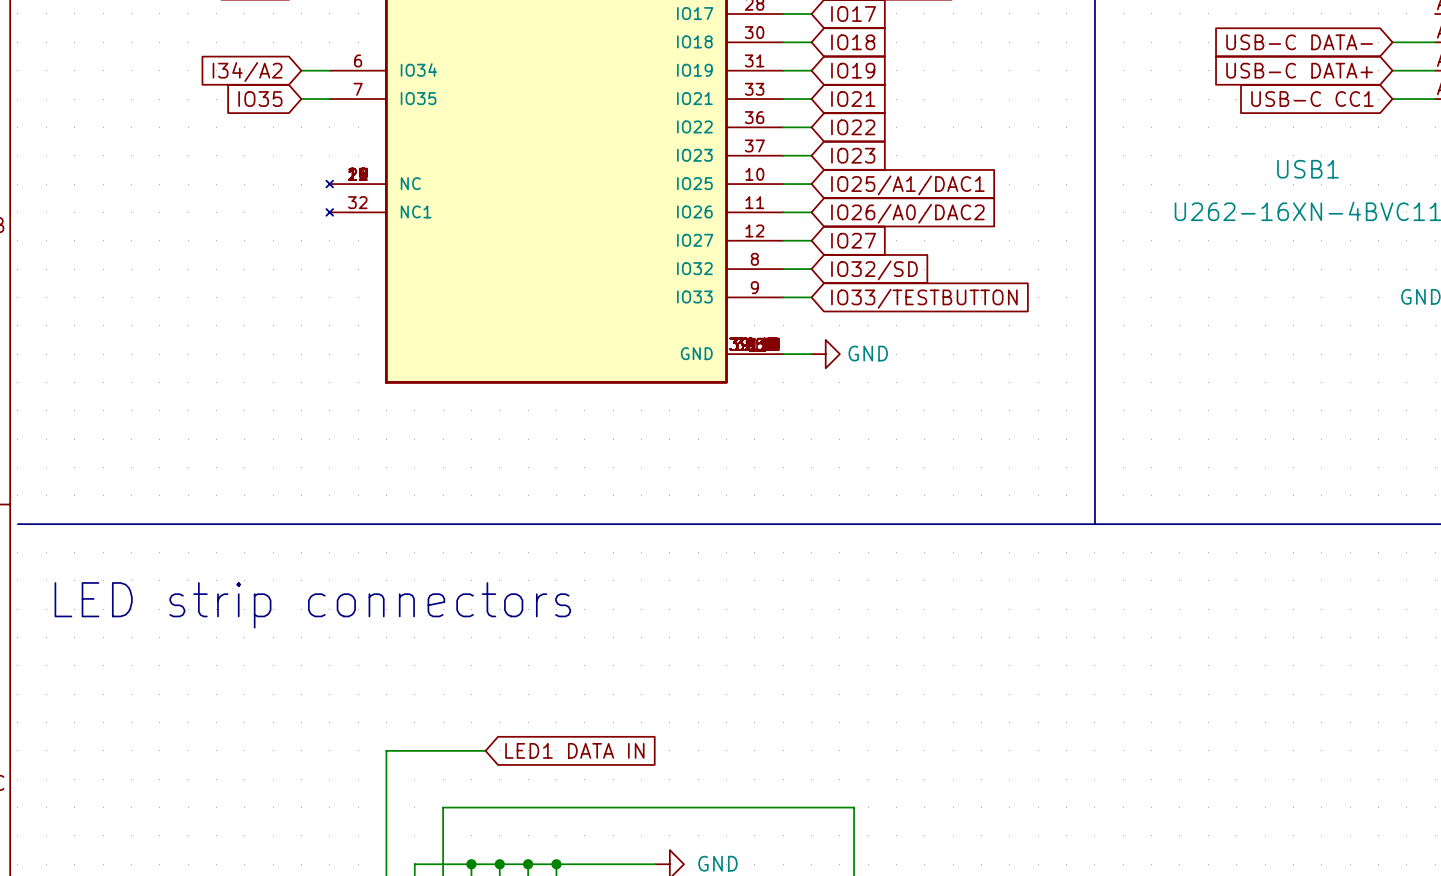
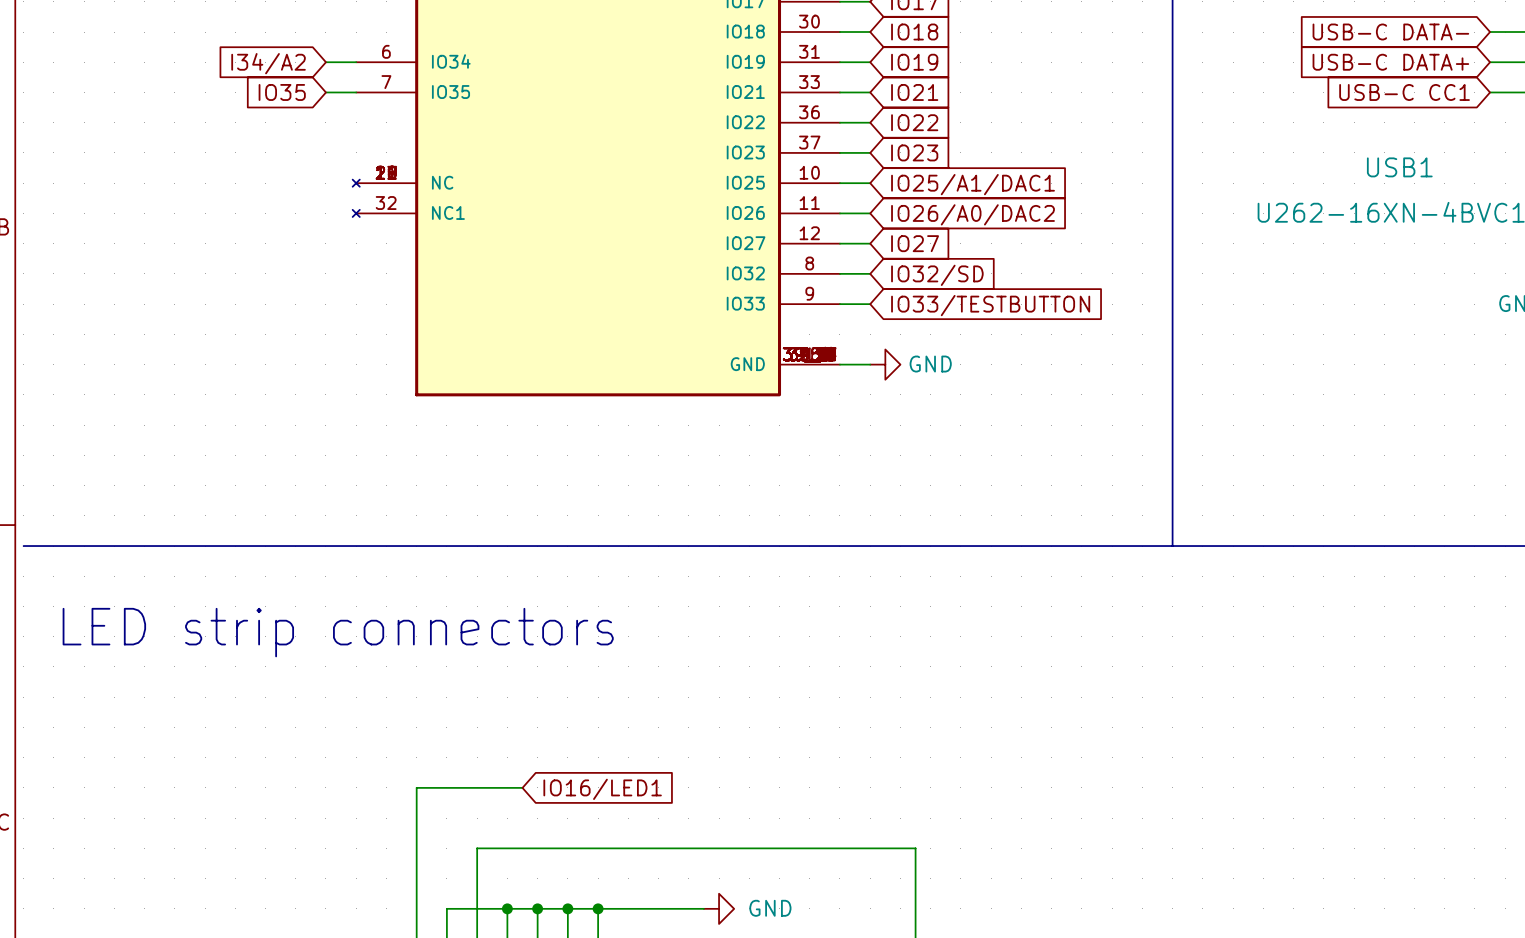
global label: LED1 DATA IN (574, 750) -> IO16/LED1 (602, 789)

